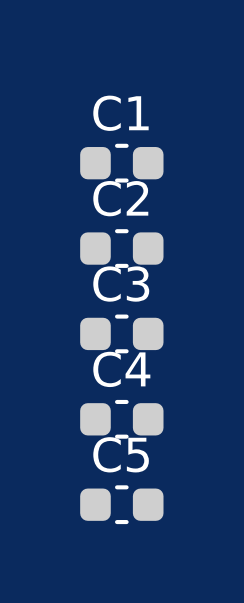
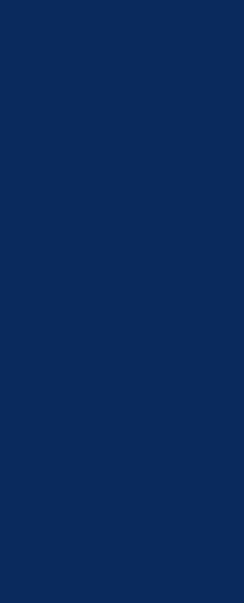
C1: (121, 163) -> none
C2: (121, 248) -> none
C3: (121, 333) -> none
C4: (121, 419) -> none
C5: (121, 504) -> none

